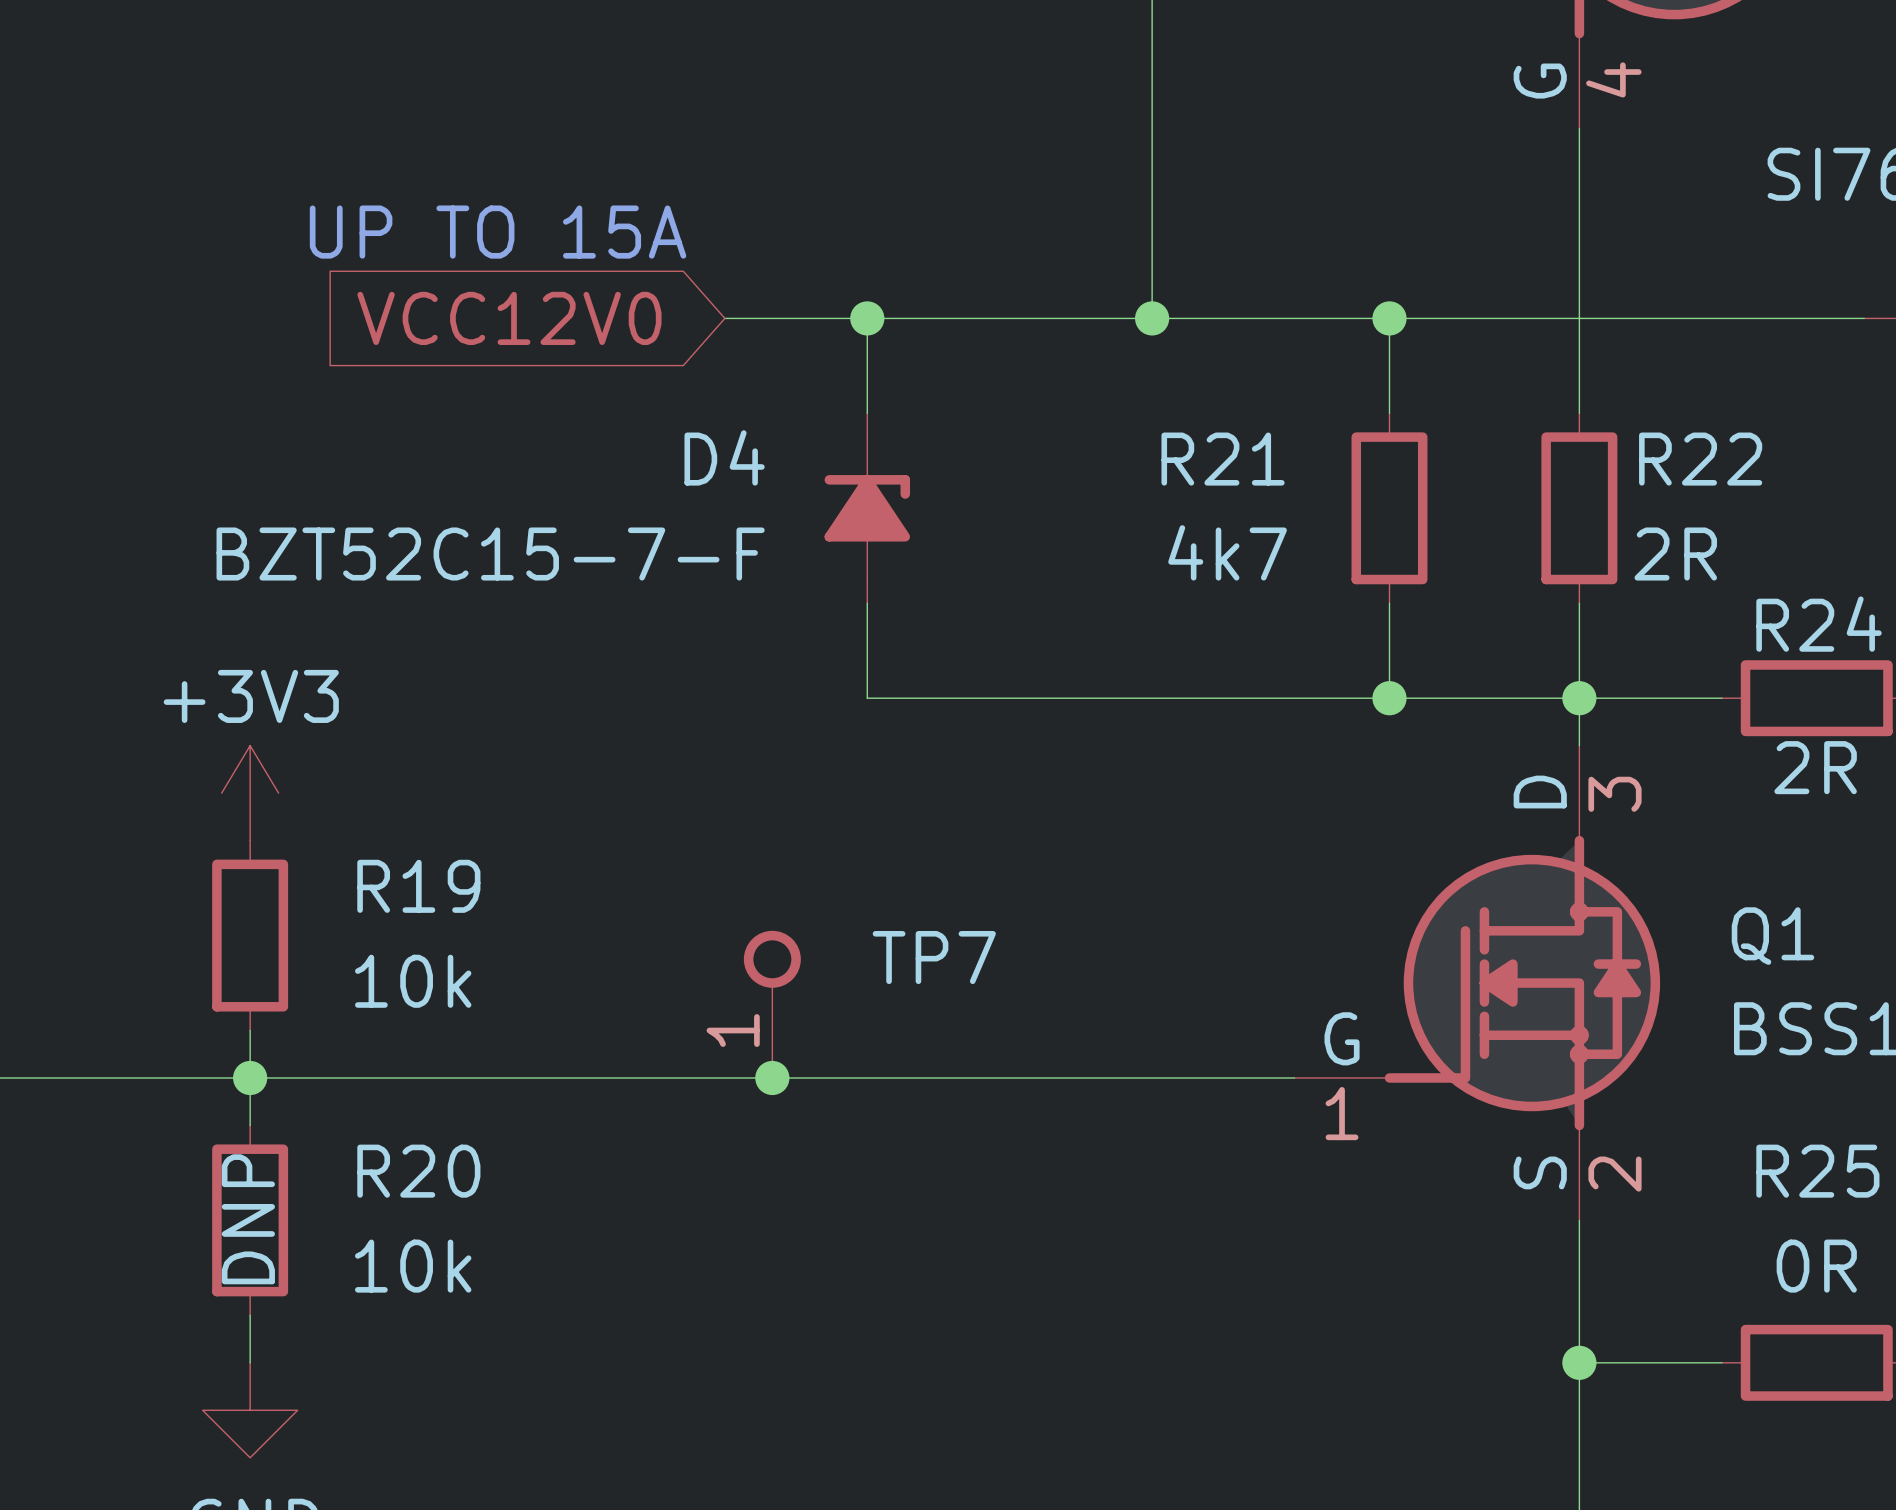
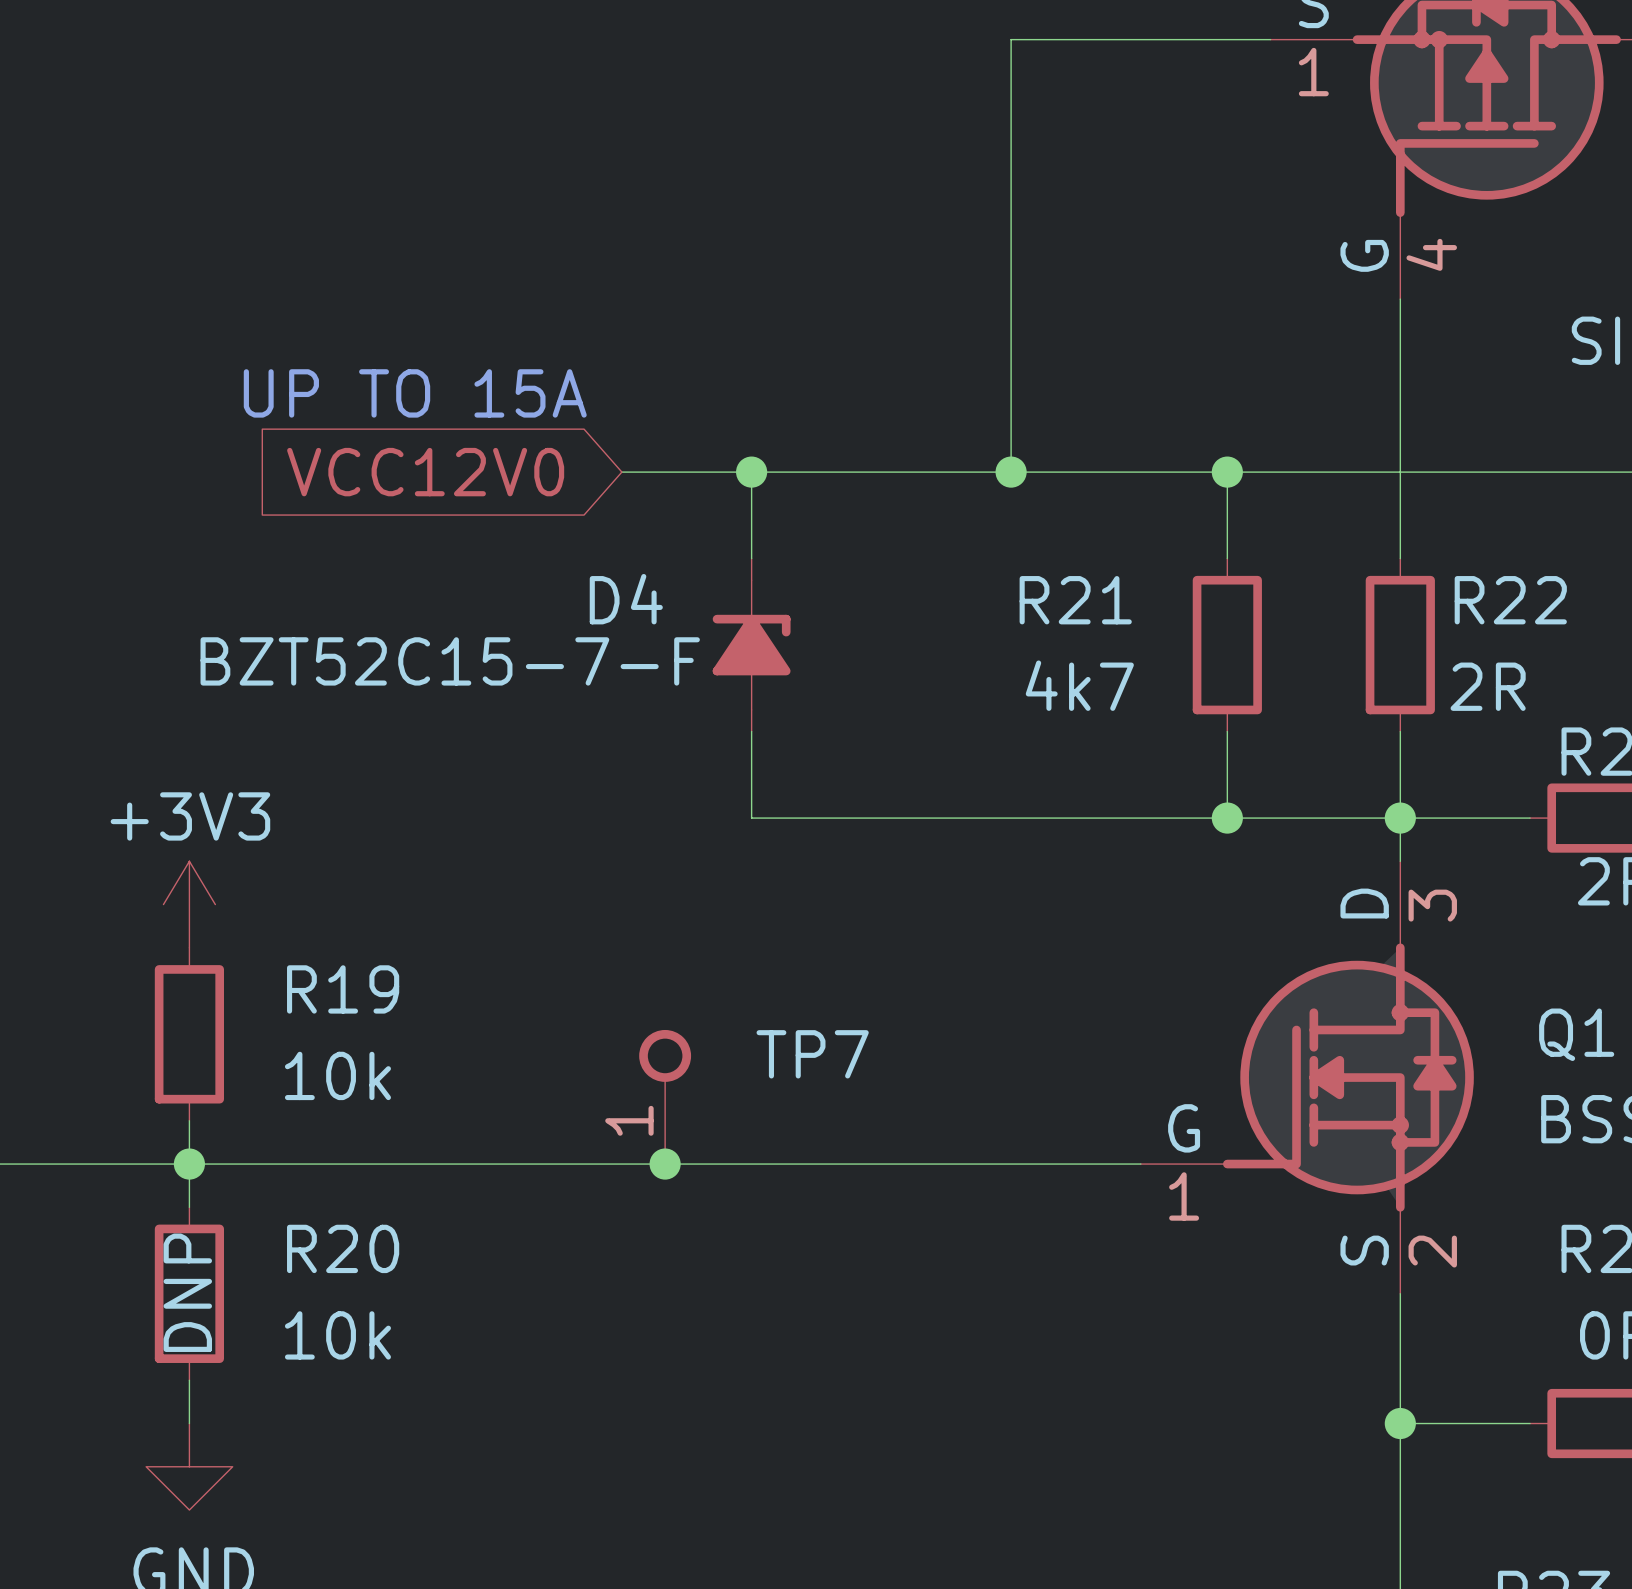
D4 name position: D4 (724, 457) -> D4 (626, 599)
D4 text position: BZT52C15-7-F (490, 554) -> BZT52C15-7-F (450, 661)

